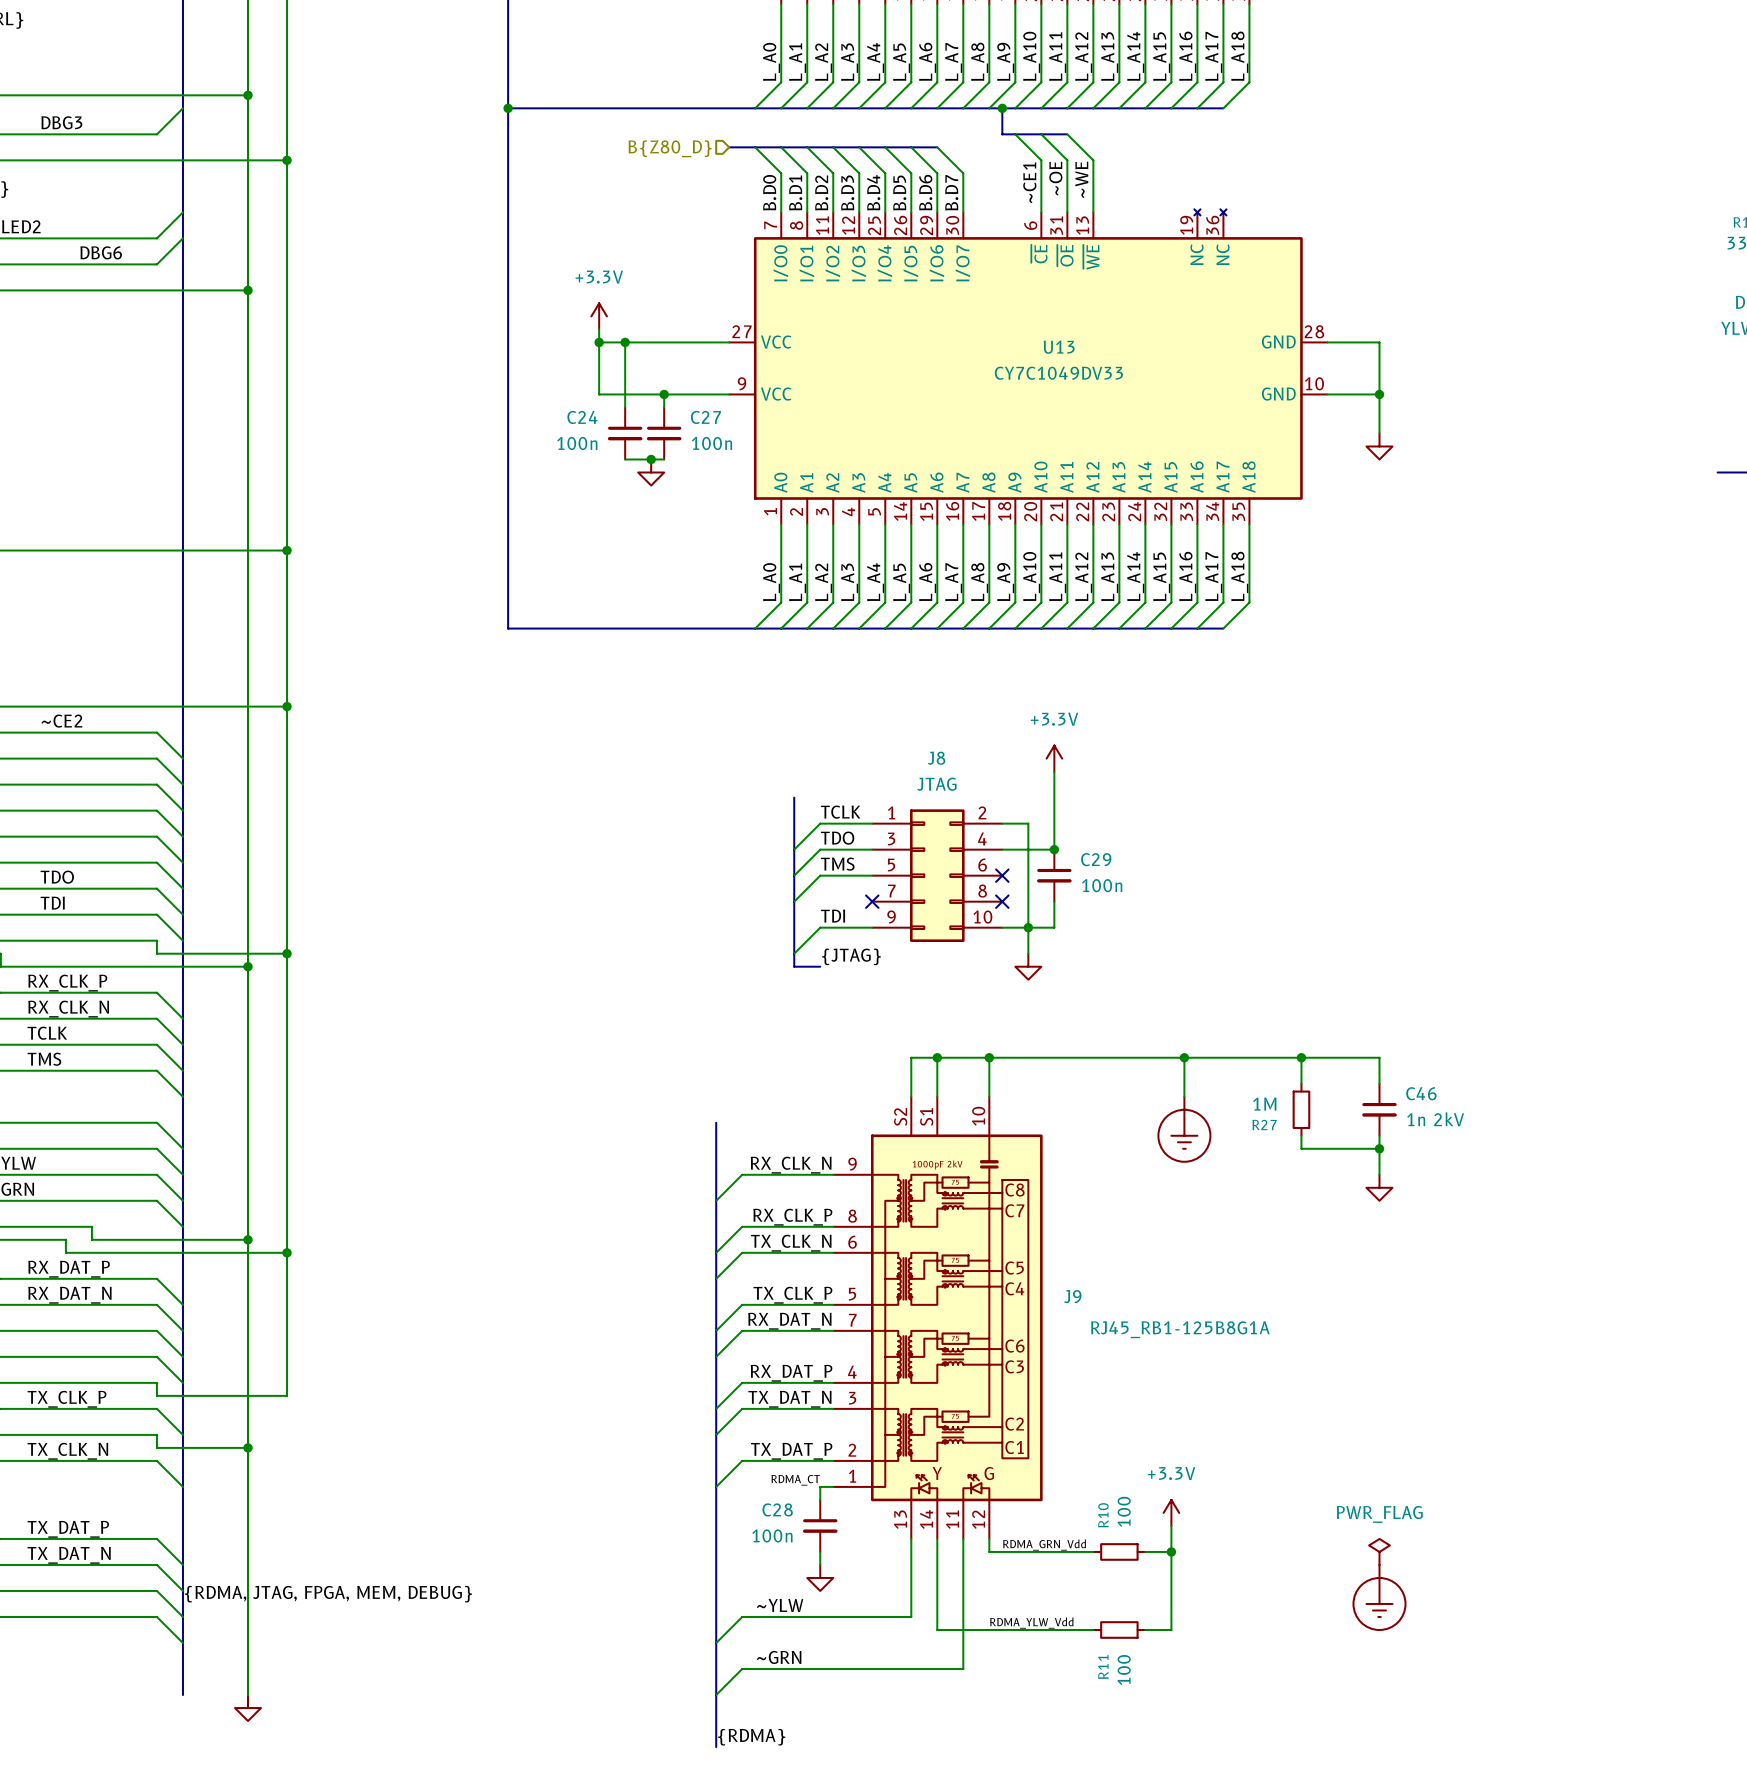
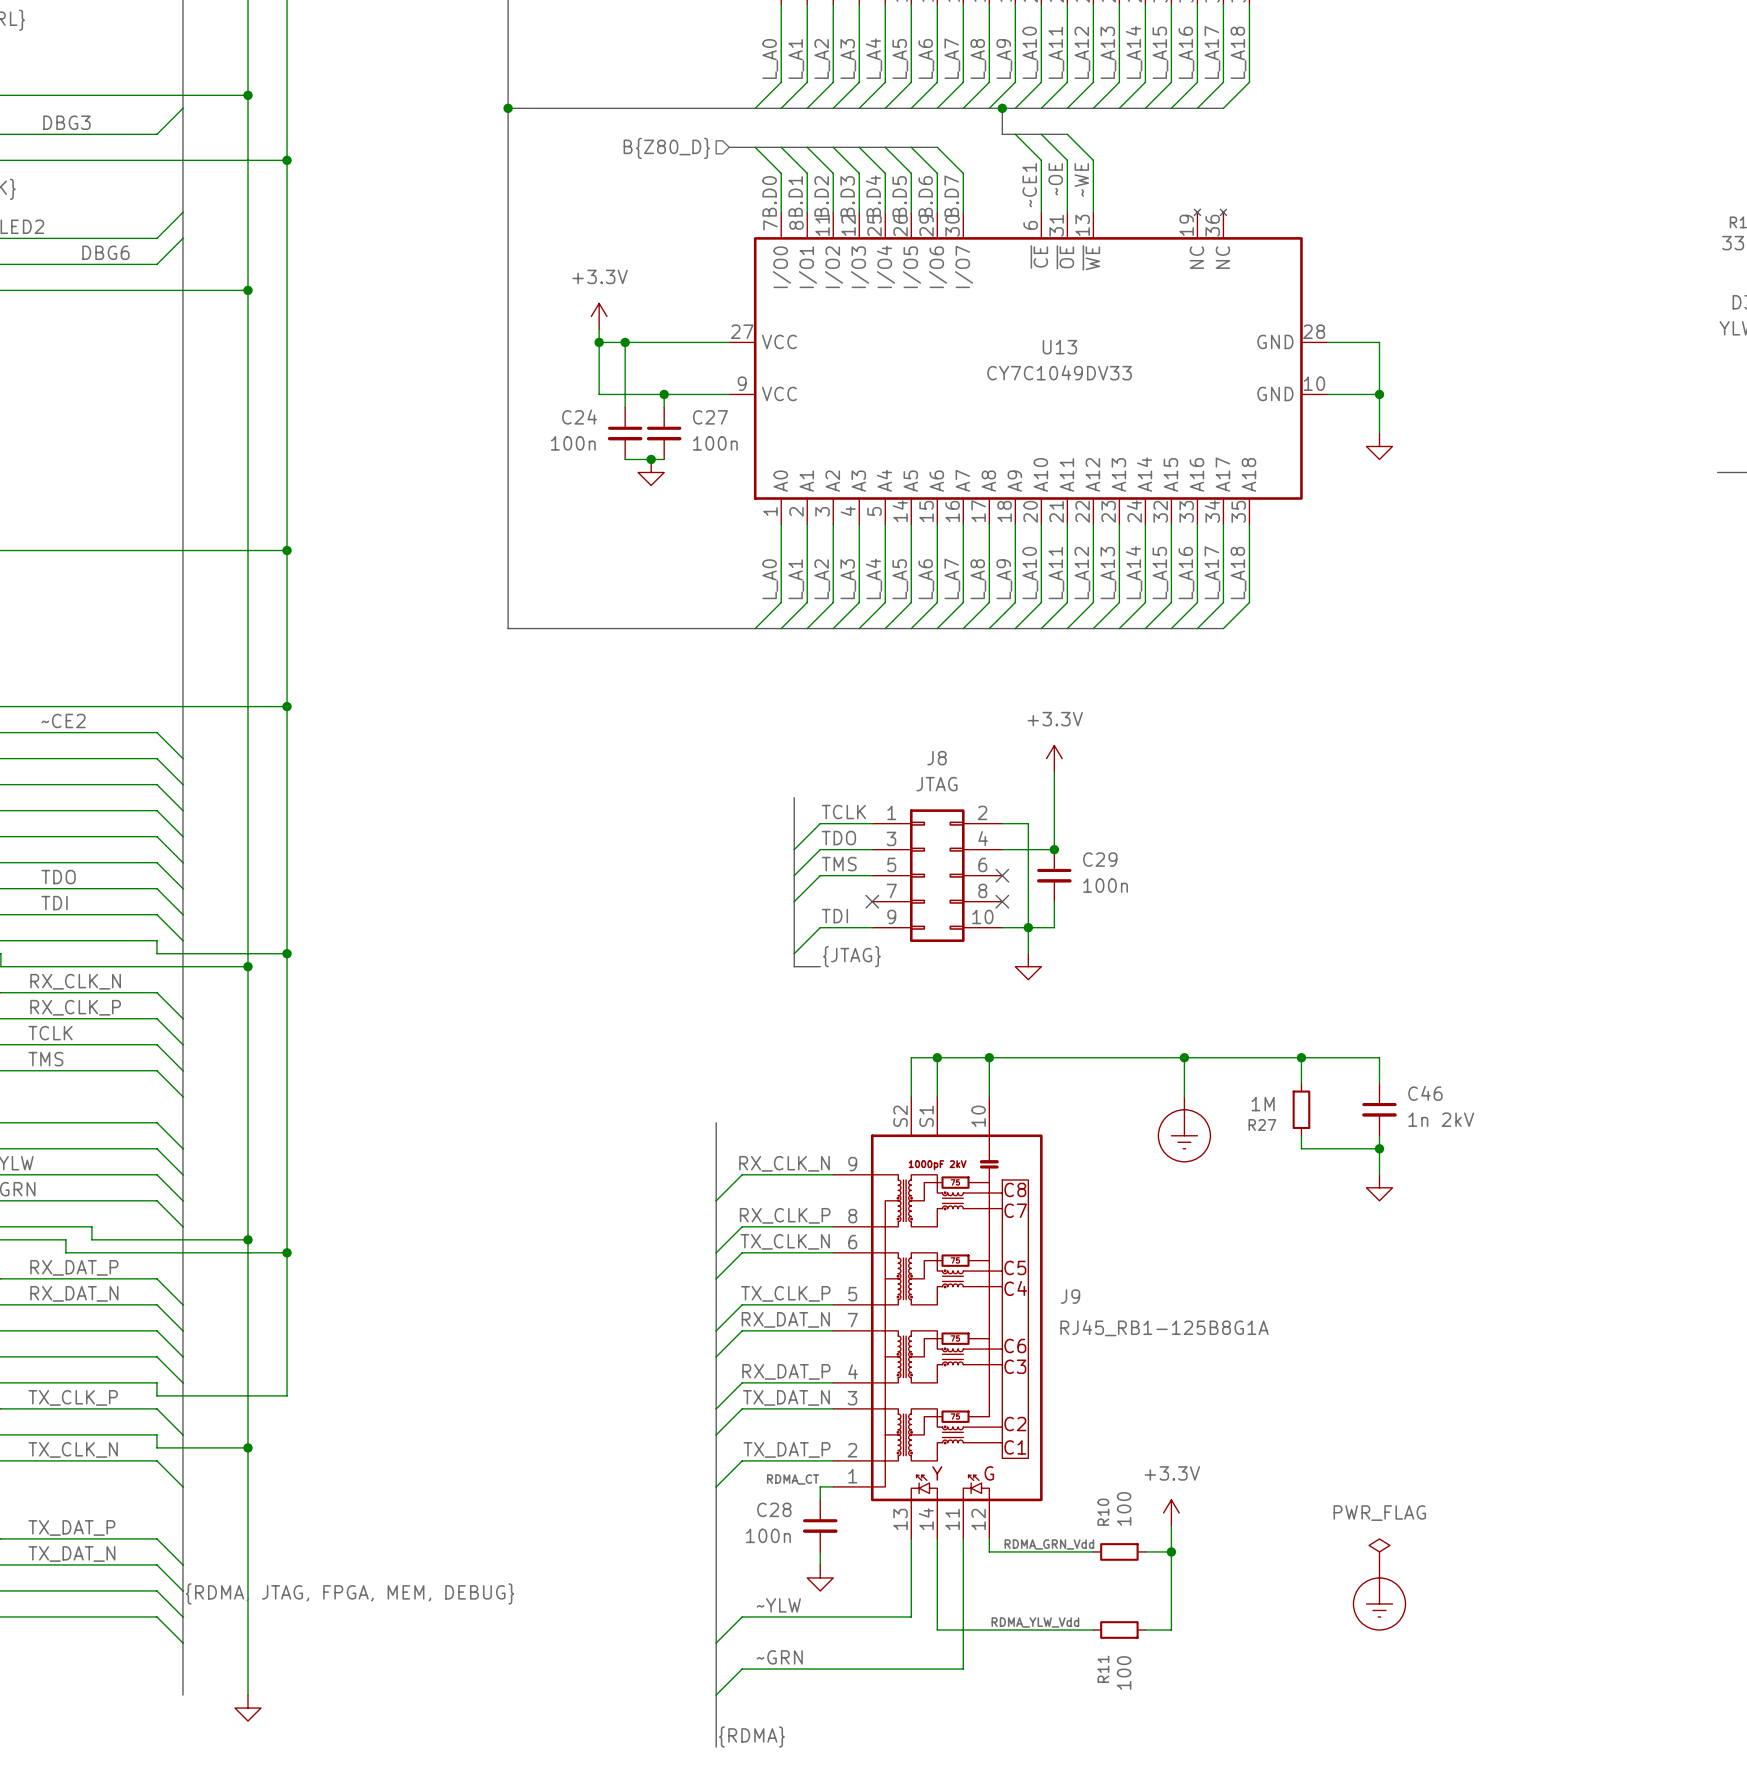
label: RX_CLK_P (67, 983) -> RX_CLK_N (75, 981)
label: RX_CLK_N (68, 1009) -> RX_CLK_P (75, 1007)

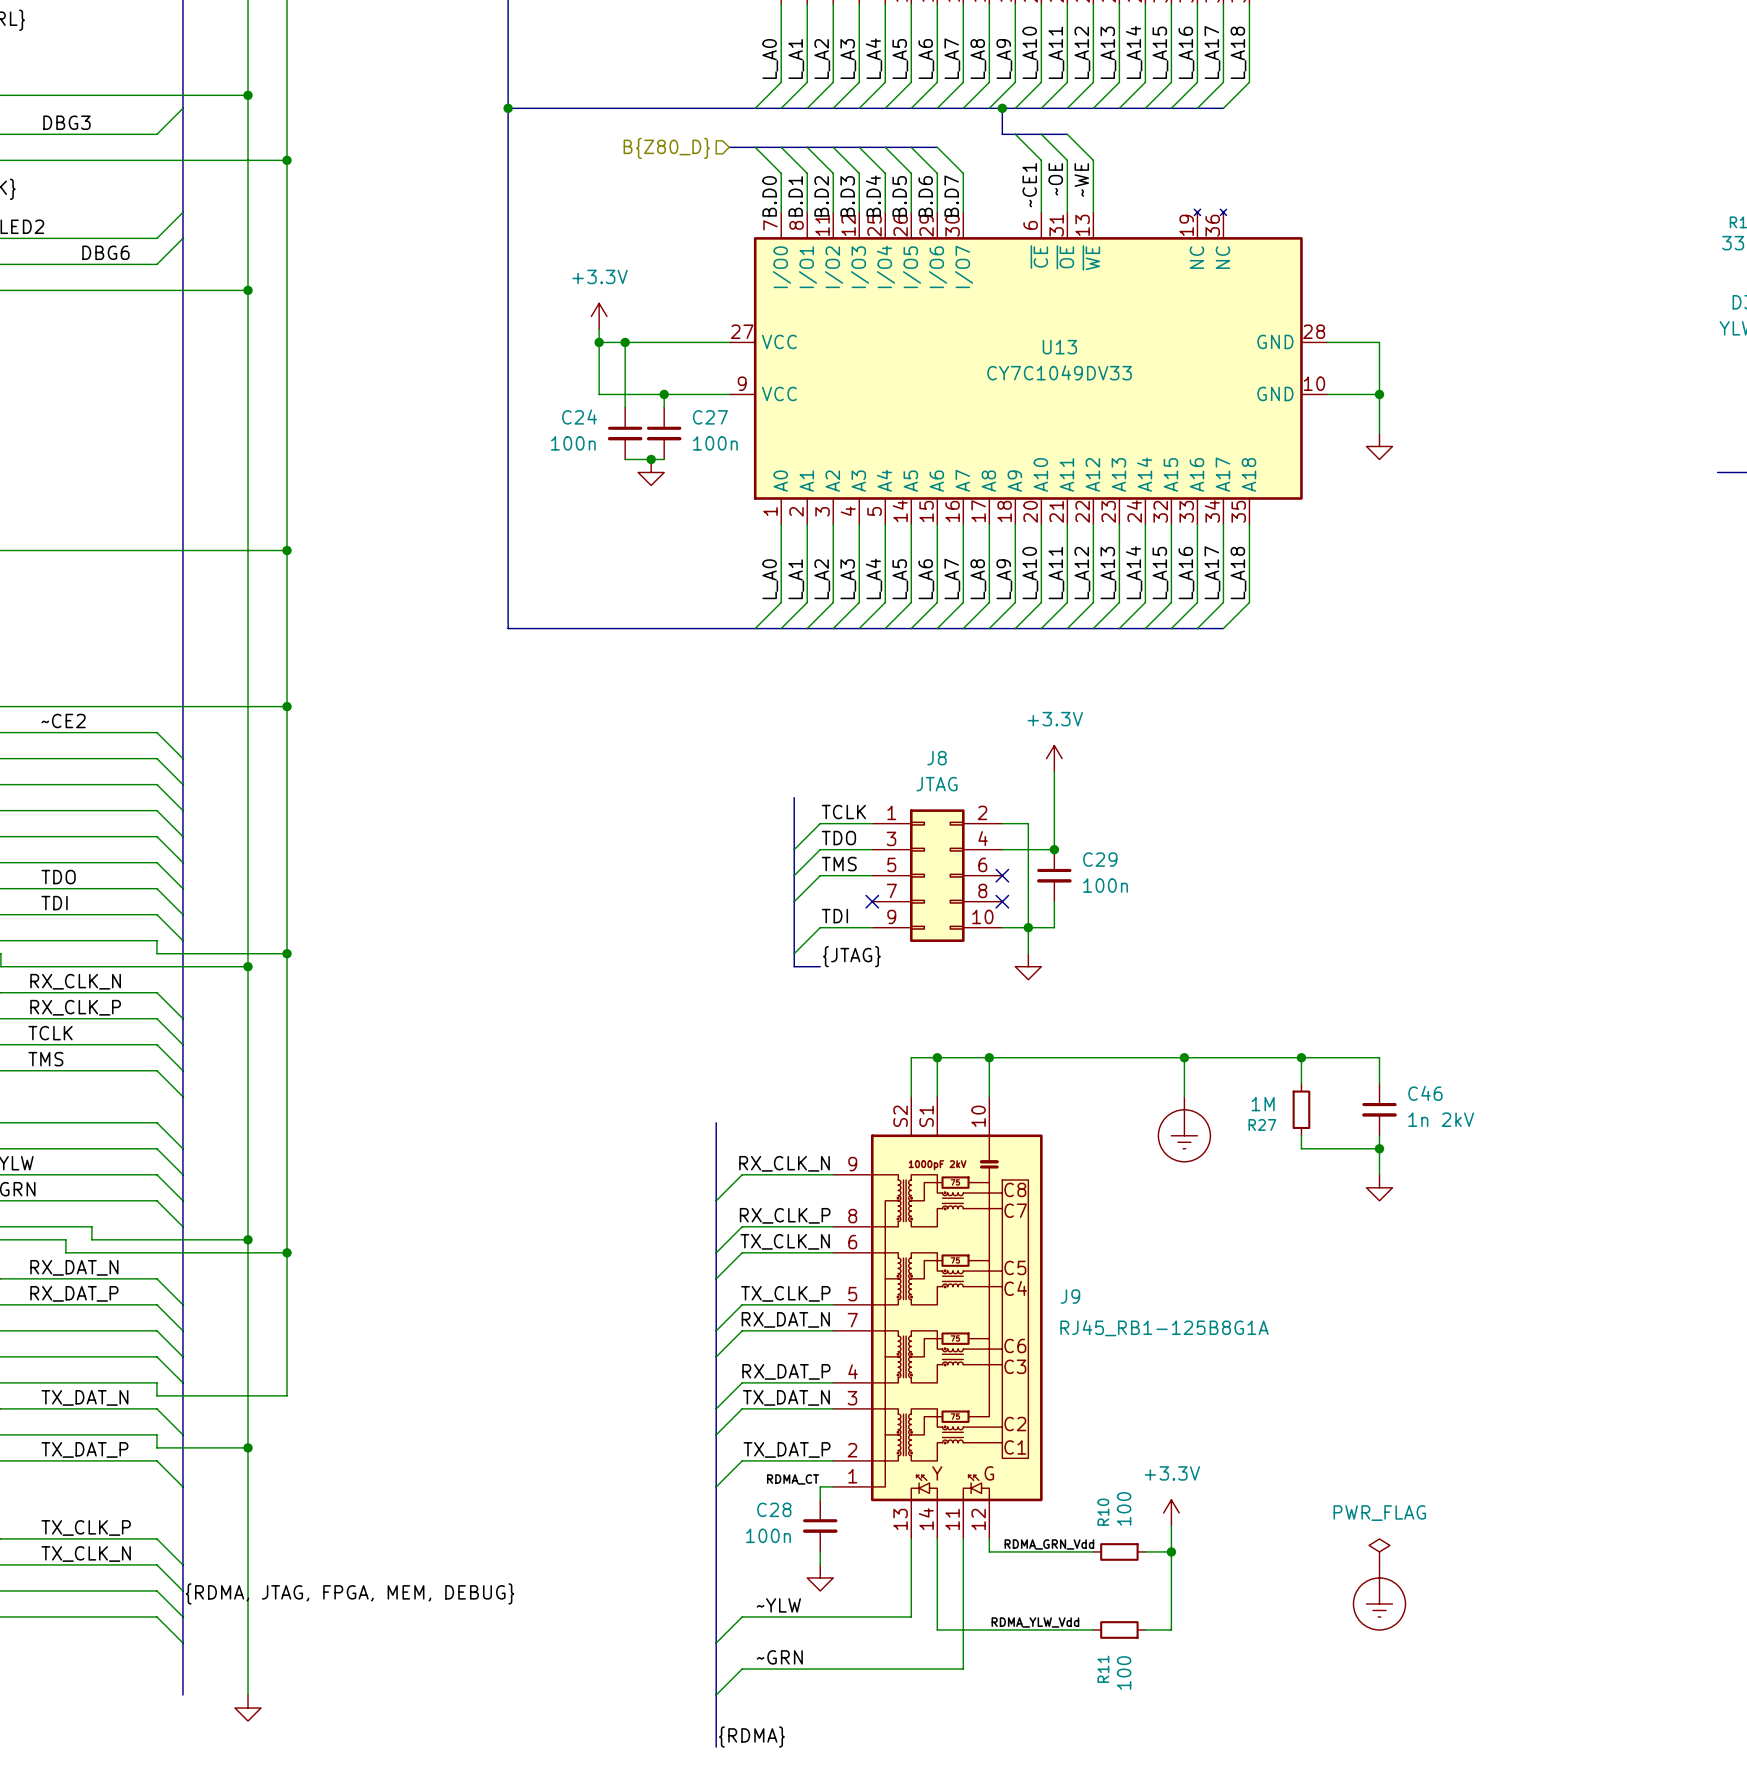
label: RX_DAT_P (74, 1267) -> RX_DAT_N (74, 1267)
label: RX_DAT_N (74, 1293) -> RX_DAT_P (74, 1293)
label position: TX_CLK_P (73, 1397) -> TX_CLK_P (86, 1527)
label position: TX_CLK_N (73, 1449) -> TX_CLK_N (86, 1553)
label position: TX_DAT_P (71, 1527) -> TX_DAT_P (84, 1449)
label position: TX_DAT_N (71, 1553) -> TX_DAT_N (84, 1397)

